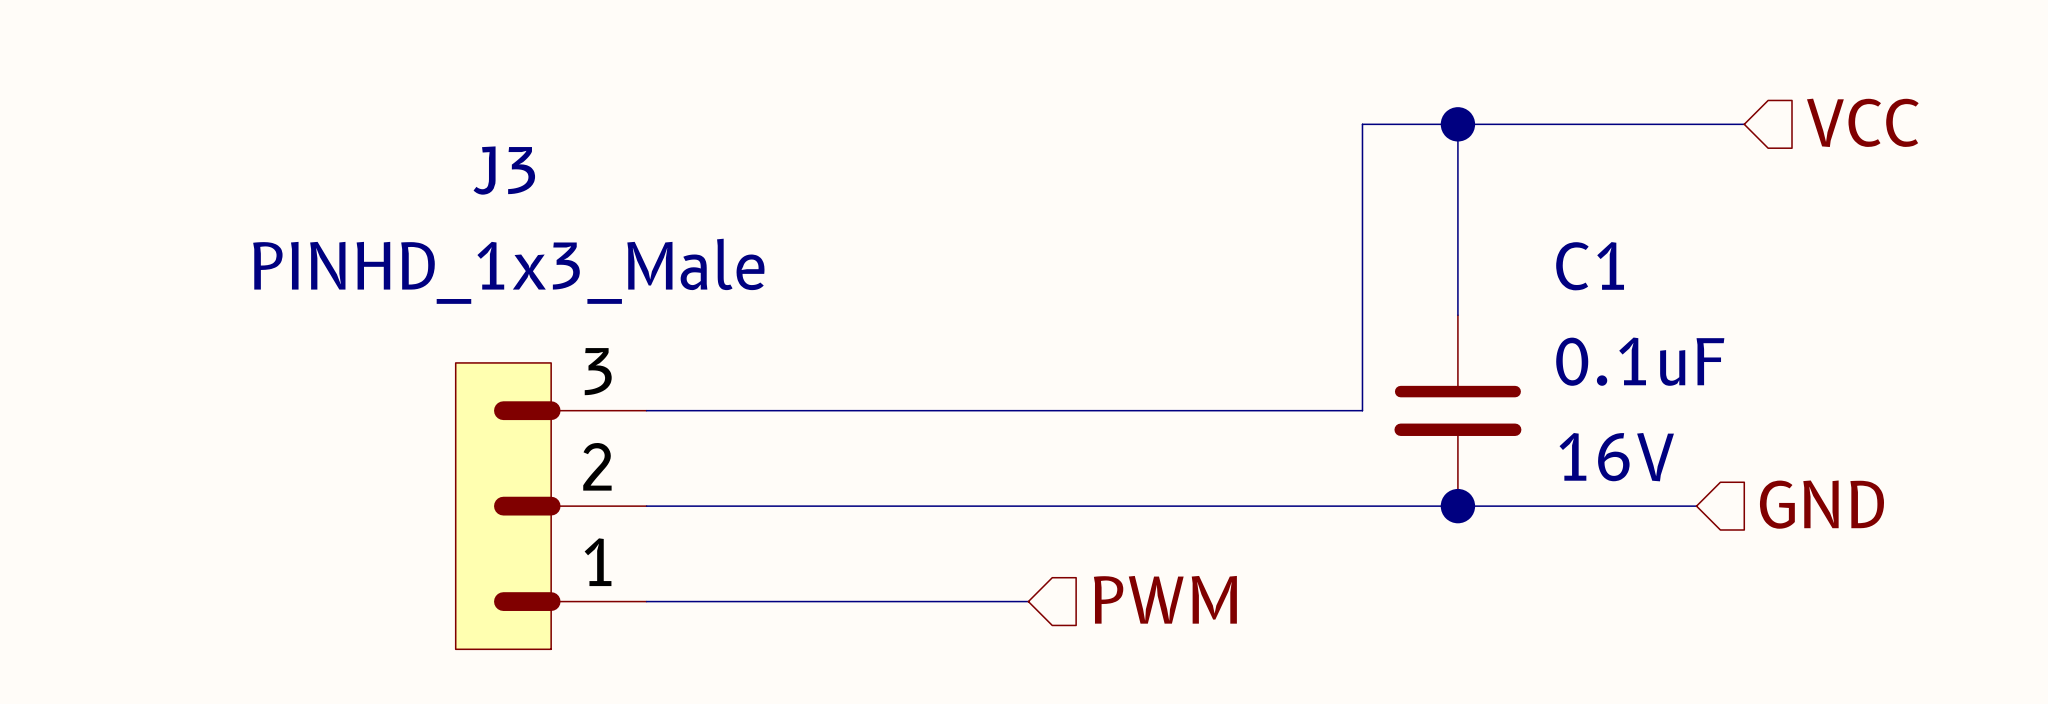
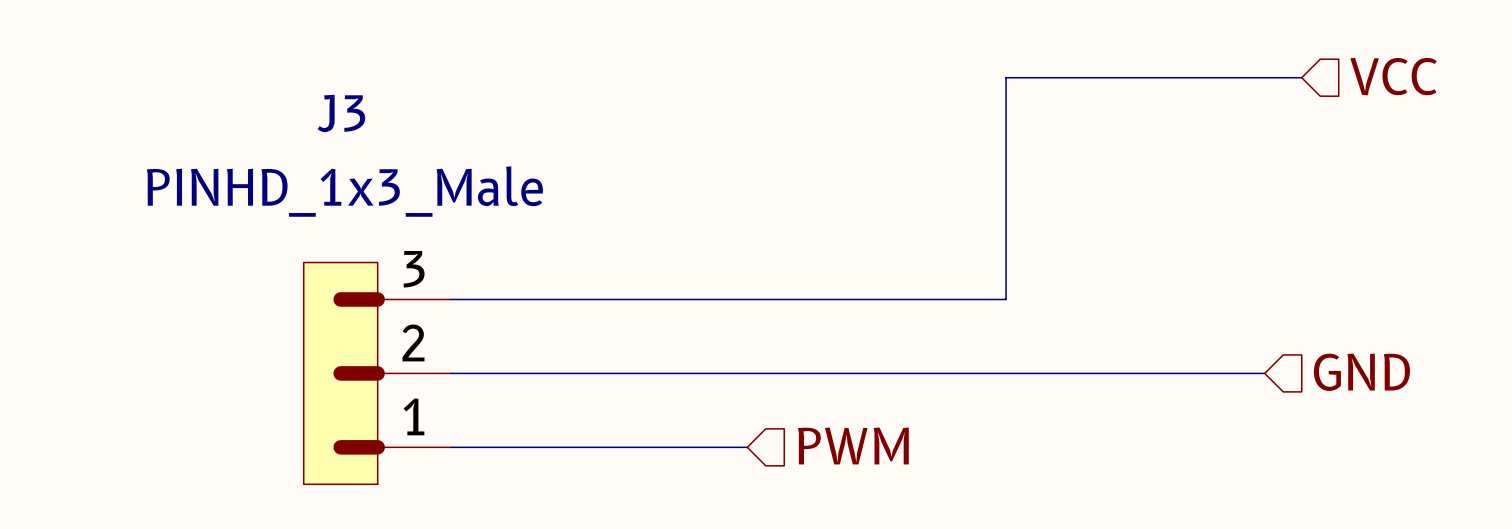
wire: (1457, 124) (1457, 315) -> none
junction: (1457, 124) -> none
C1: 0.1uF (1457, 410) -> none
junction: (1457, 506) -> none

